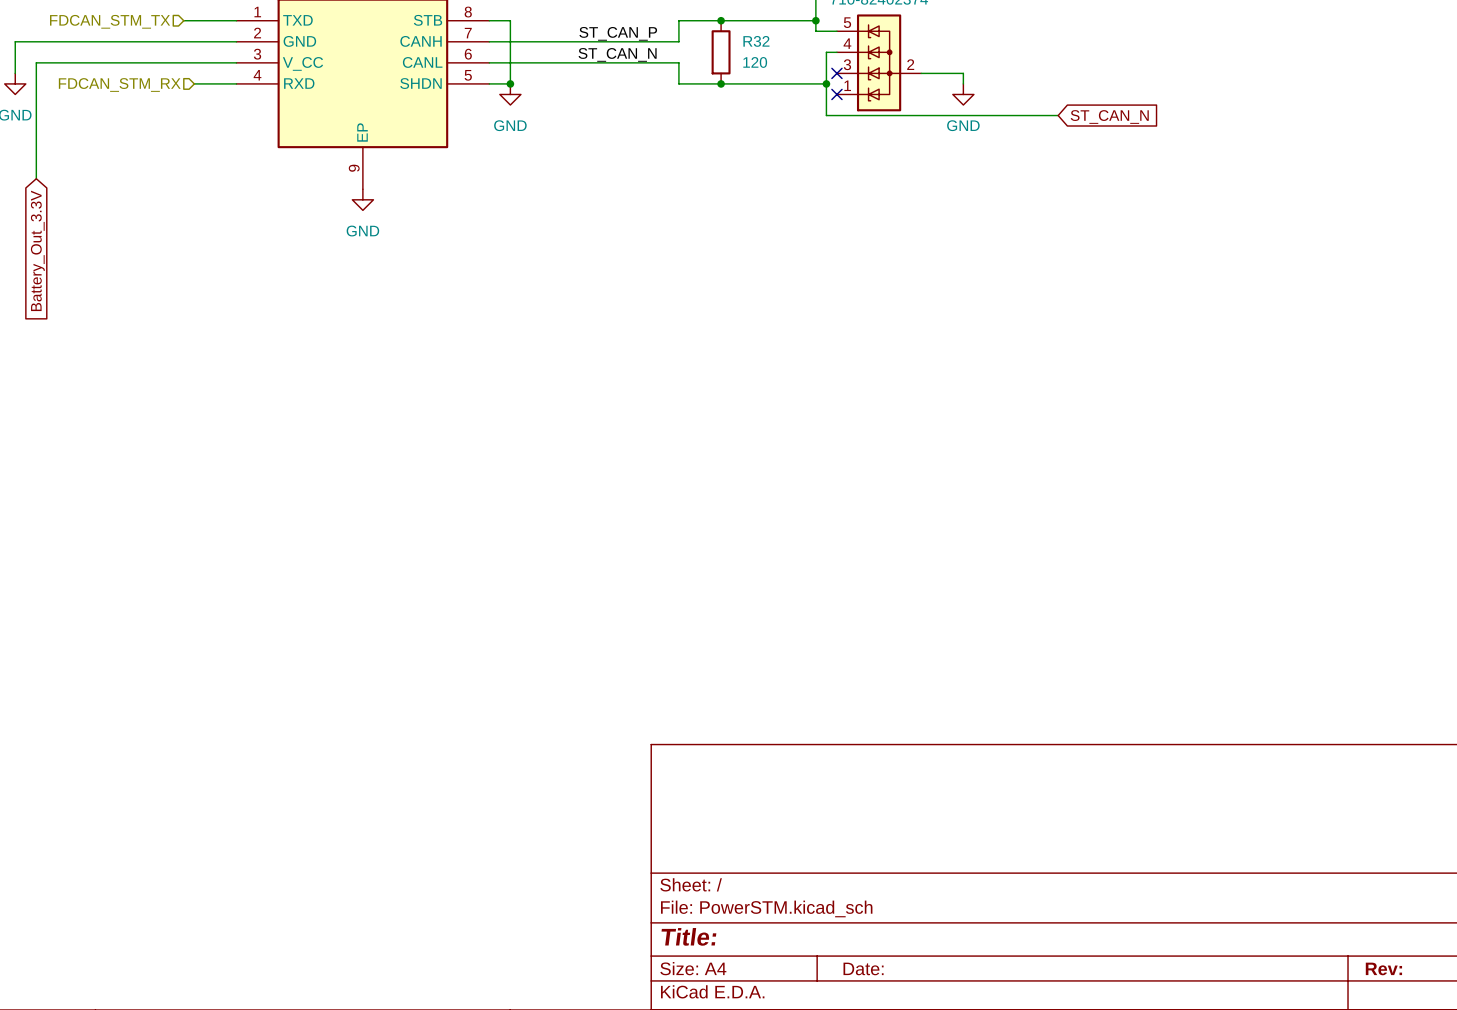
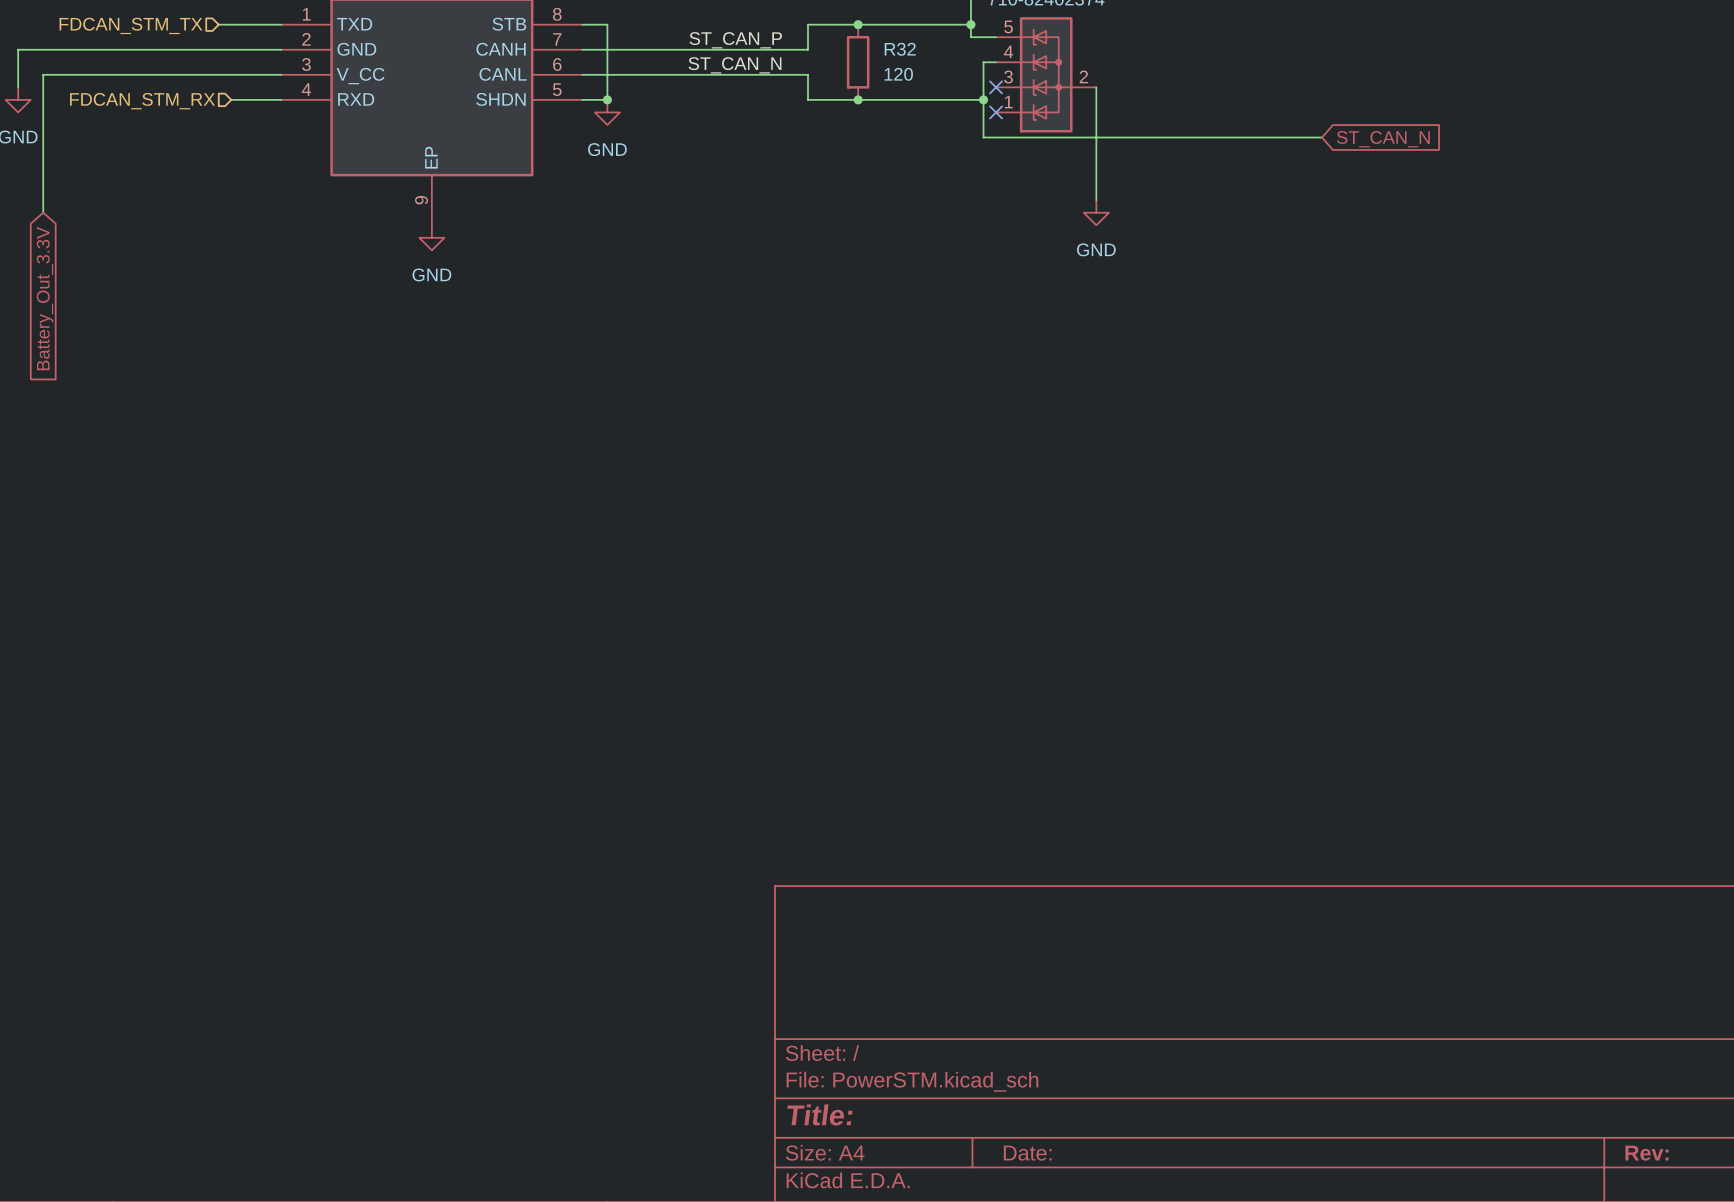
wire: (921, 73) (963, 73) (963, 83) -> (1096, 87) (1096, 200)
power symbol position: GND (963, 94) -> GND (1096, 212)
wire: none -> (1259, 137) (1322, 137)
global label position: ST_CAN_N (1109, 116) -> ST_CAN_N (1383, 139)

